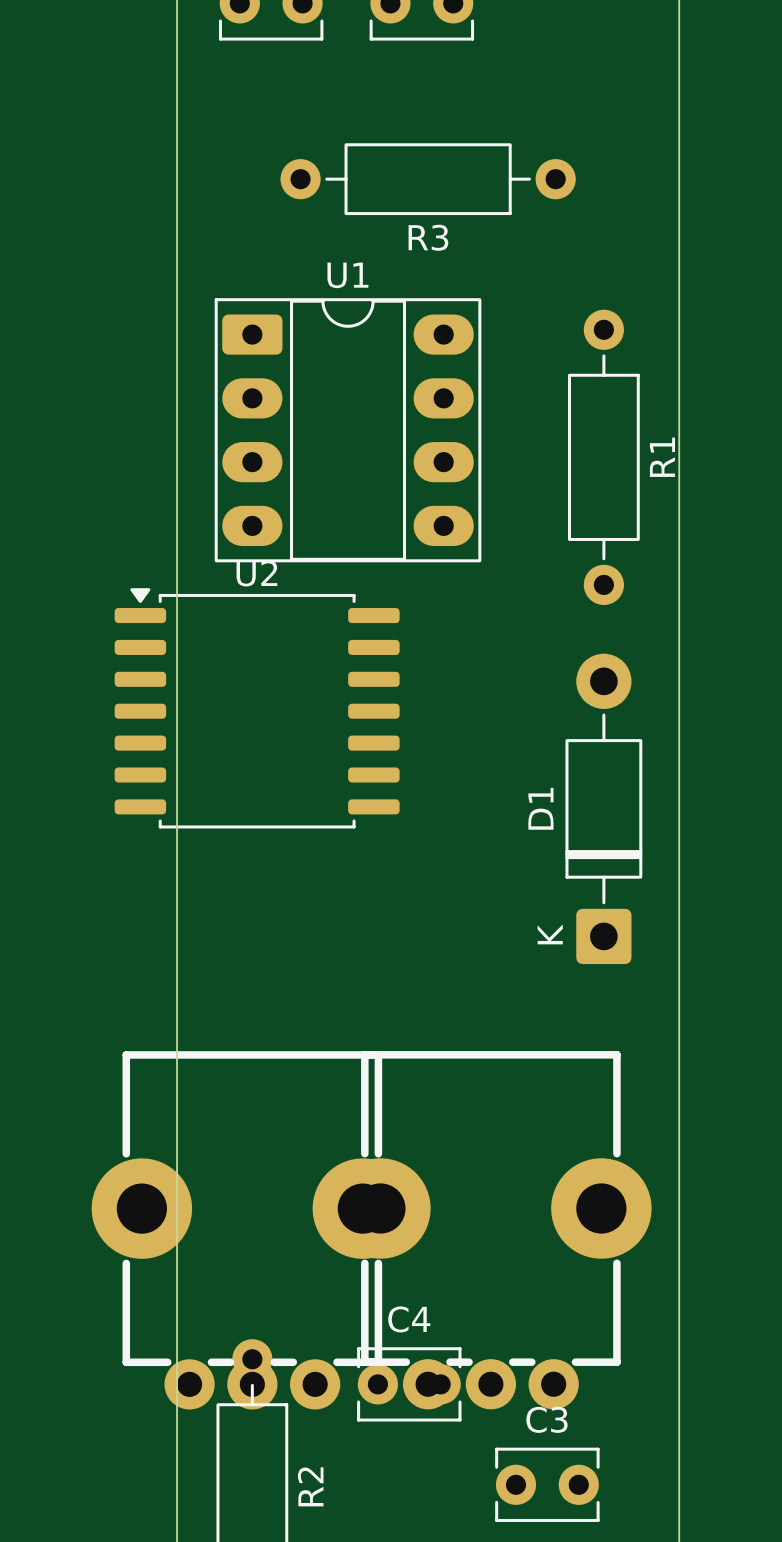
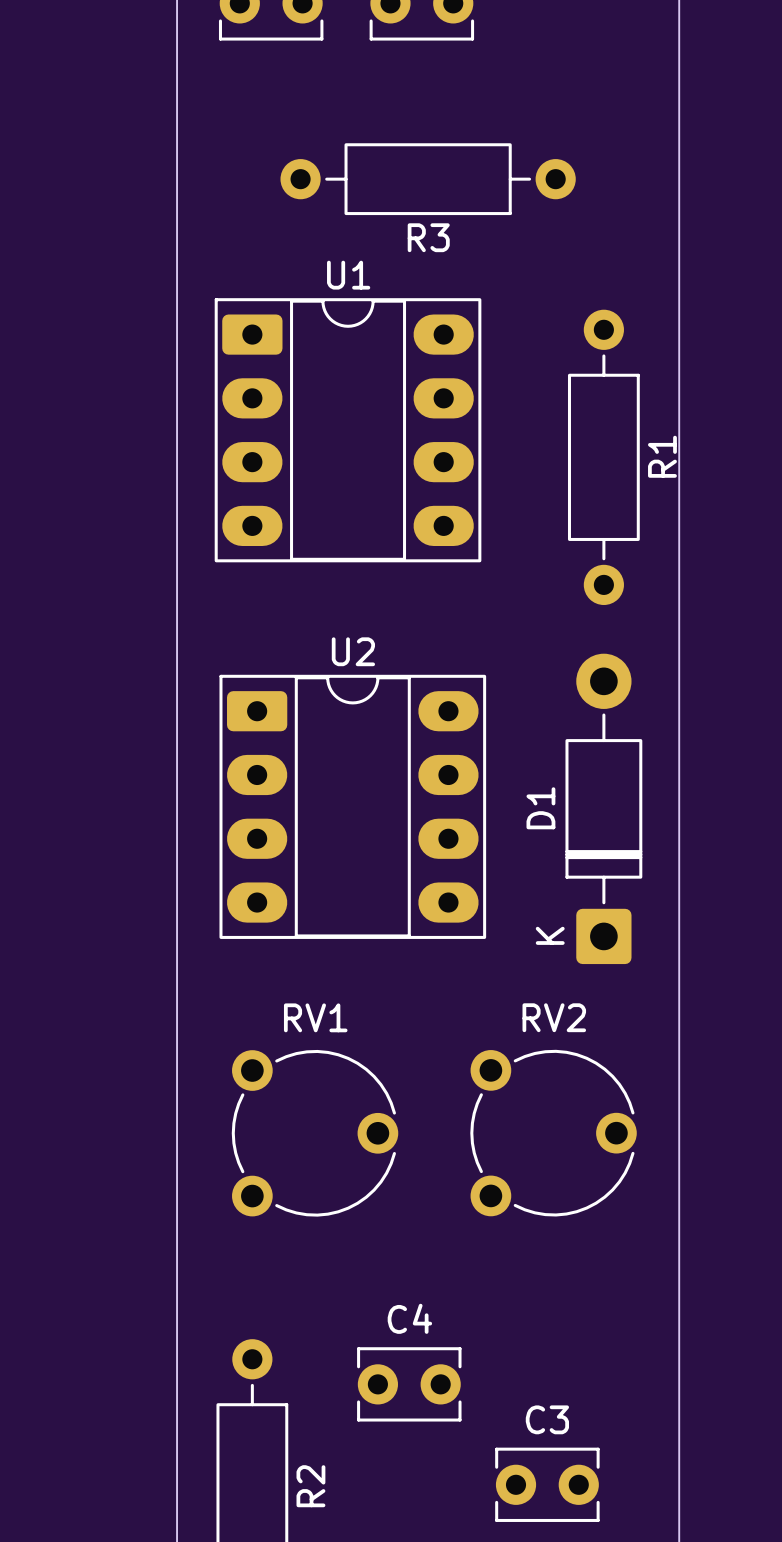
U2 footprint: [114, 588, 400, 829] -> [219, 674, 487, 939]
RV1: none -> (315, 1133)
RV2: none -> (553, 1133)
part: (252, 1230) -> none
part: (490, 1230) -> none

